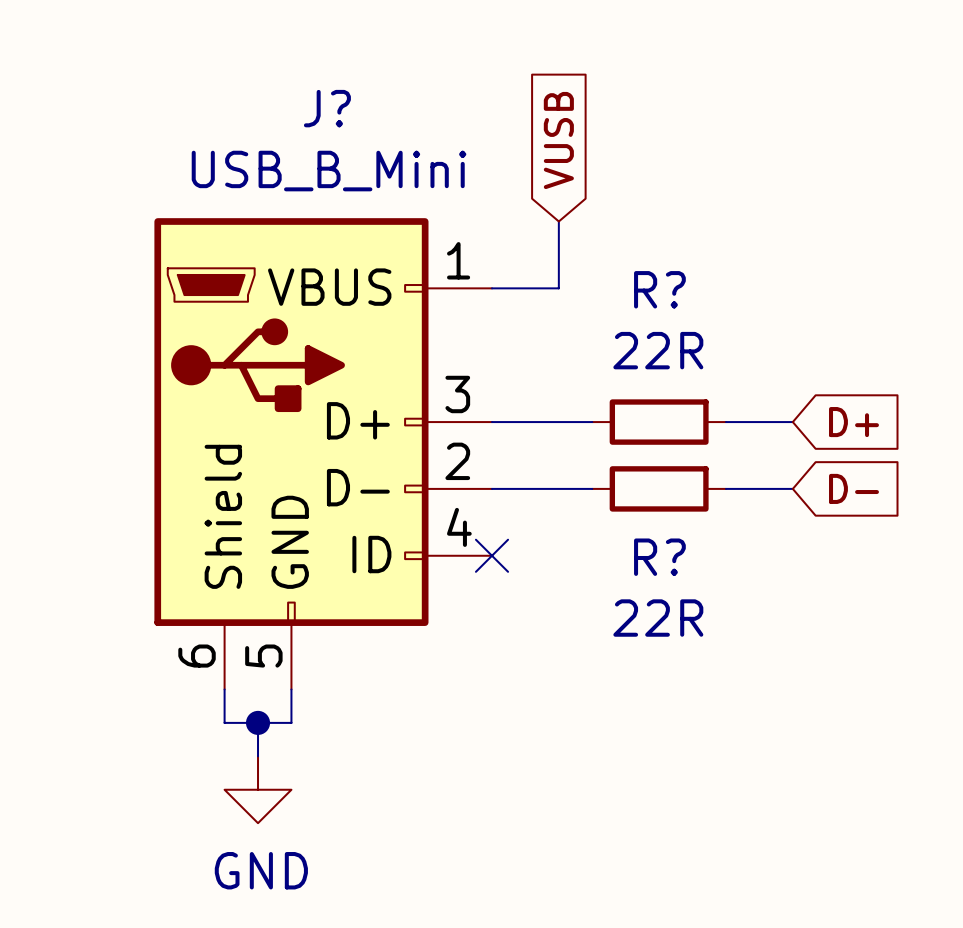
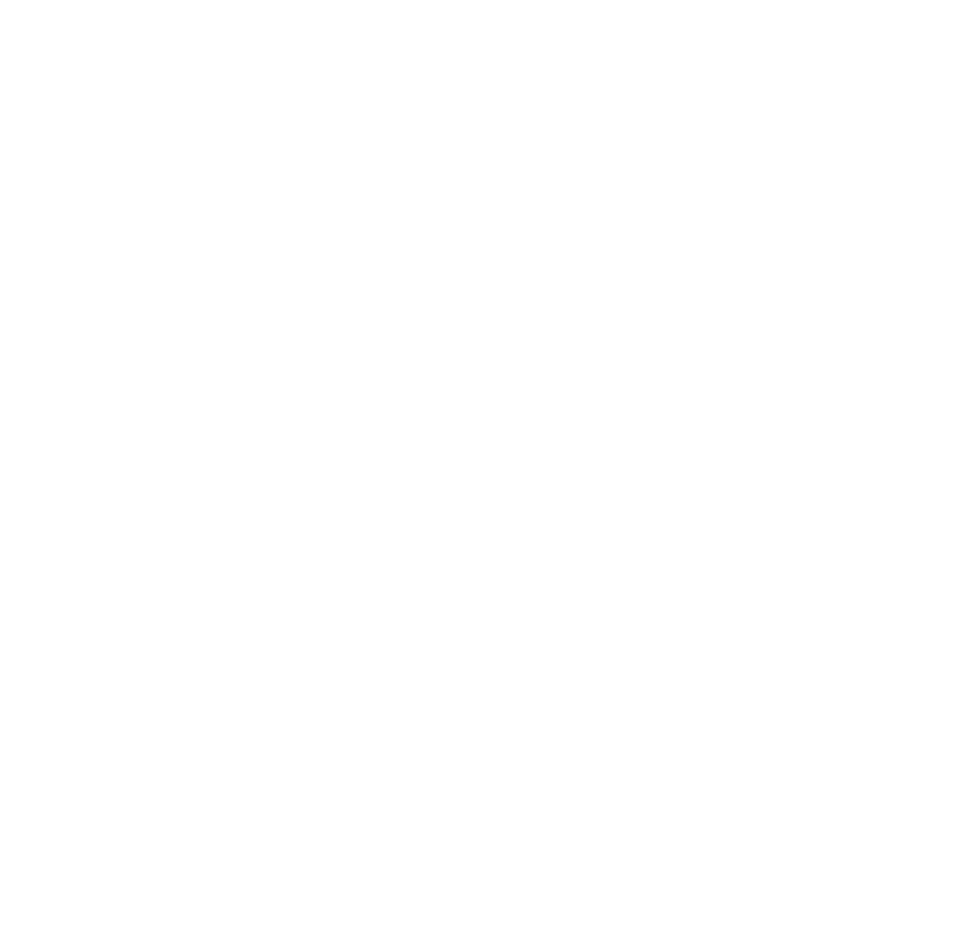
global label: VUSB (558, 140) -> none
wire: (558, 221) (558, 288) (492, 288) -> none
wire: (492, 422) (592, 422) -> none
R?: 22R (659, 422) -> none
wire: (725, 422) (792, 422) -> none
global label: D+ (853, 422) -> none
J?: USB_B_Mini (323, 453) -> none
wire: (492, 488) (592, 488) -> none
R?: 22R (659, 488) -> none
wire: (725, 488) (792, 488) -> none
global label: D- (853, 488) -> none
no-connect mark: (492, 555) -> none
wire: (224, 689) (224, 722) (291, 722) (291, 689) -> none
wire: (258, 722) (258, 756) -> none
junction: (258, 722) -> none
power symbol: GND (258, 789) -> none

